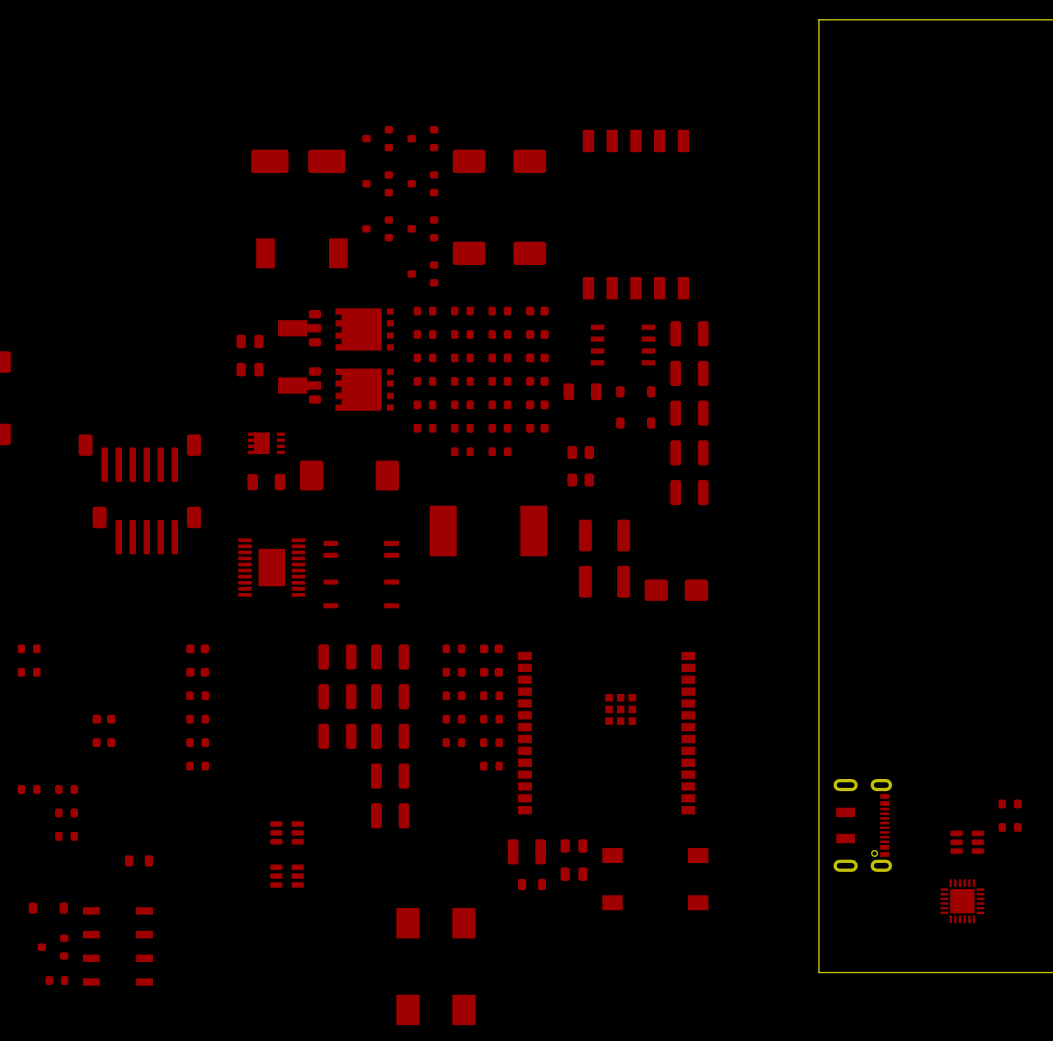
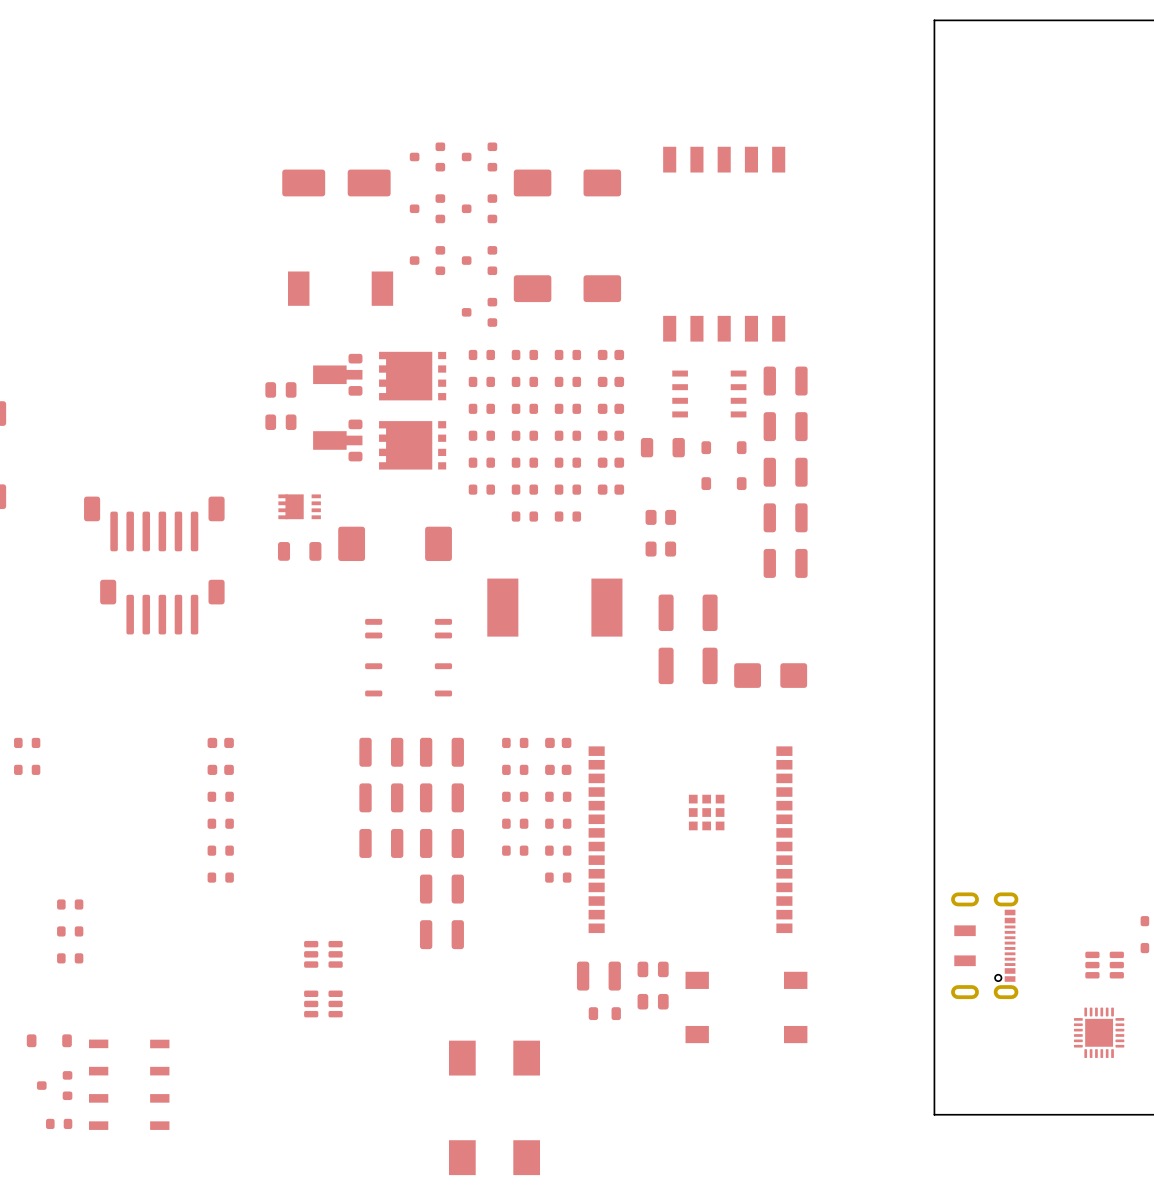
part: (271, 567) -> none
part: (104, 719) -> none
part: (104, 742) -> none
part: (29, 789) -> none
part: (138, 860) -> none

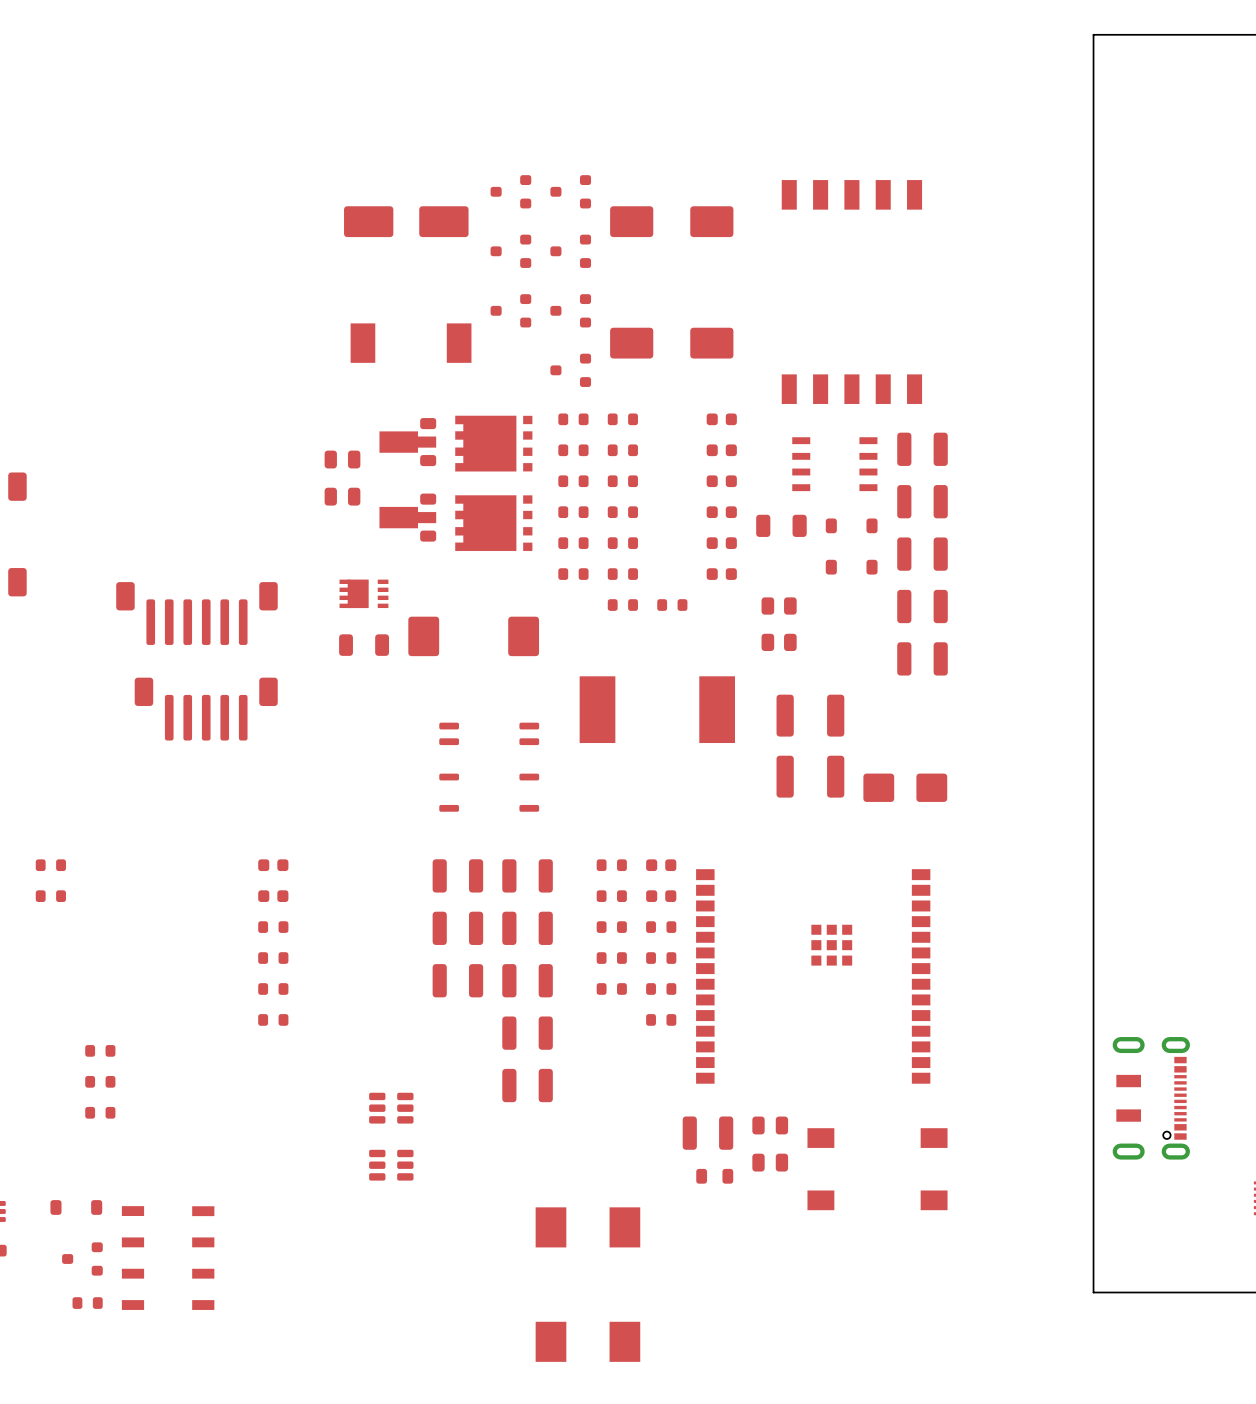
part: (567, 354) -> none
part: (567, 381) -> none
part: (567, 408) -> none
part: (567, 435) -> none
part: (567, 462) -> none
part: (567, 489) -> none

